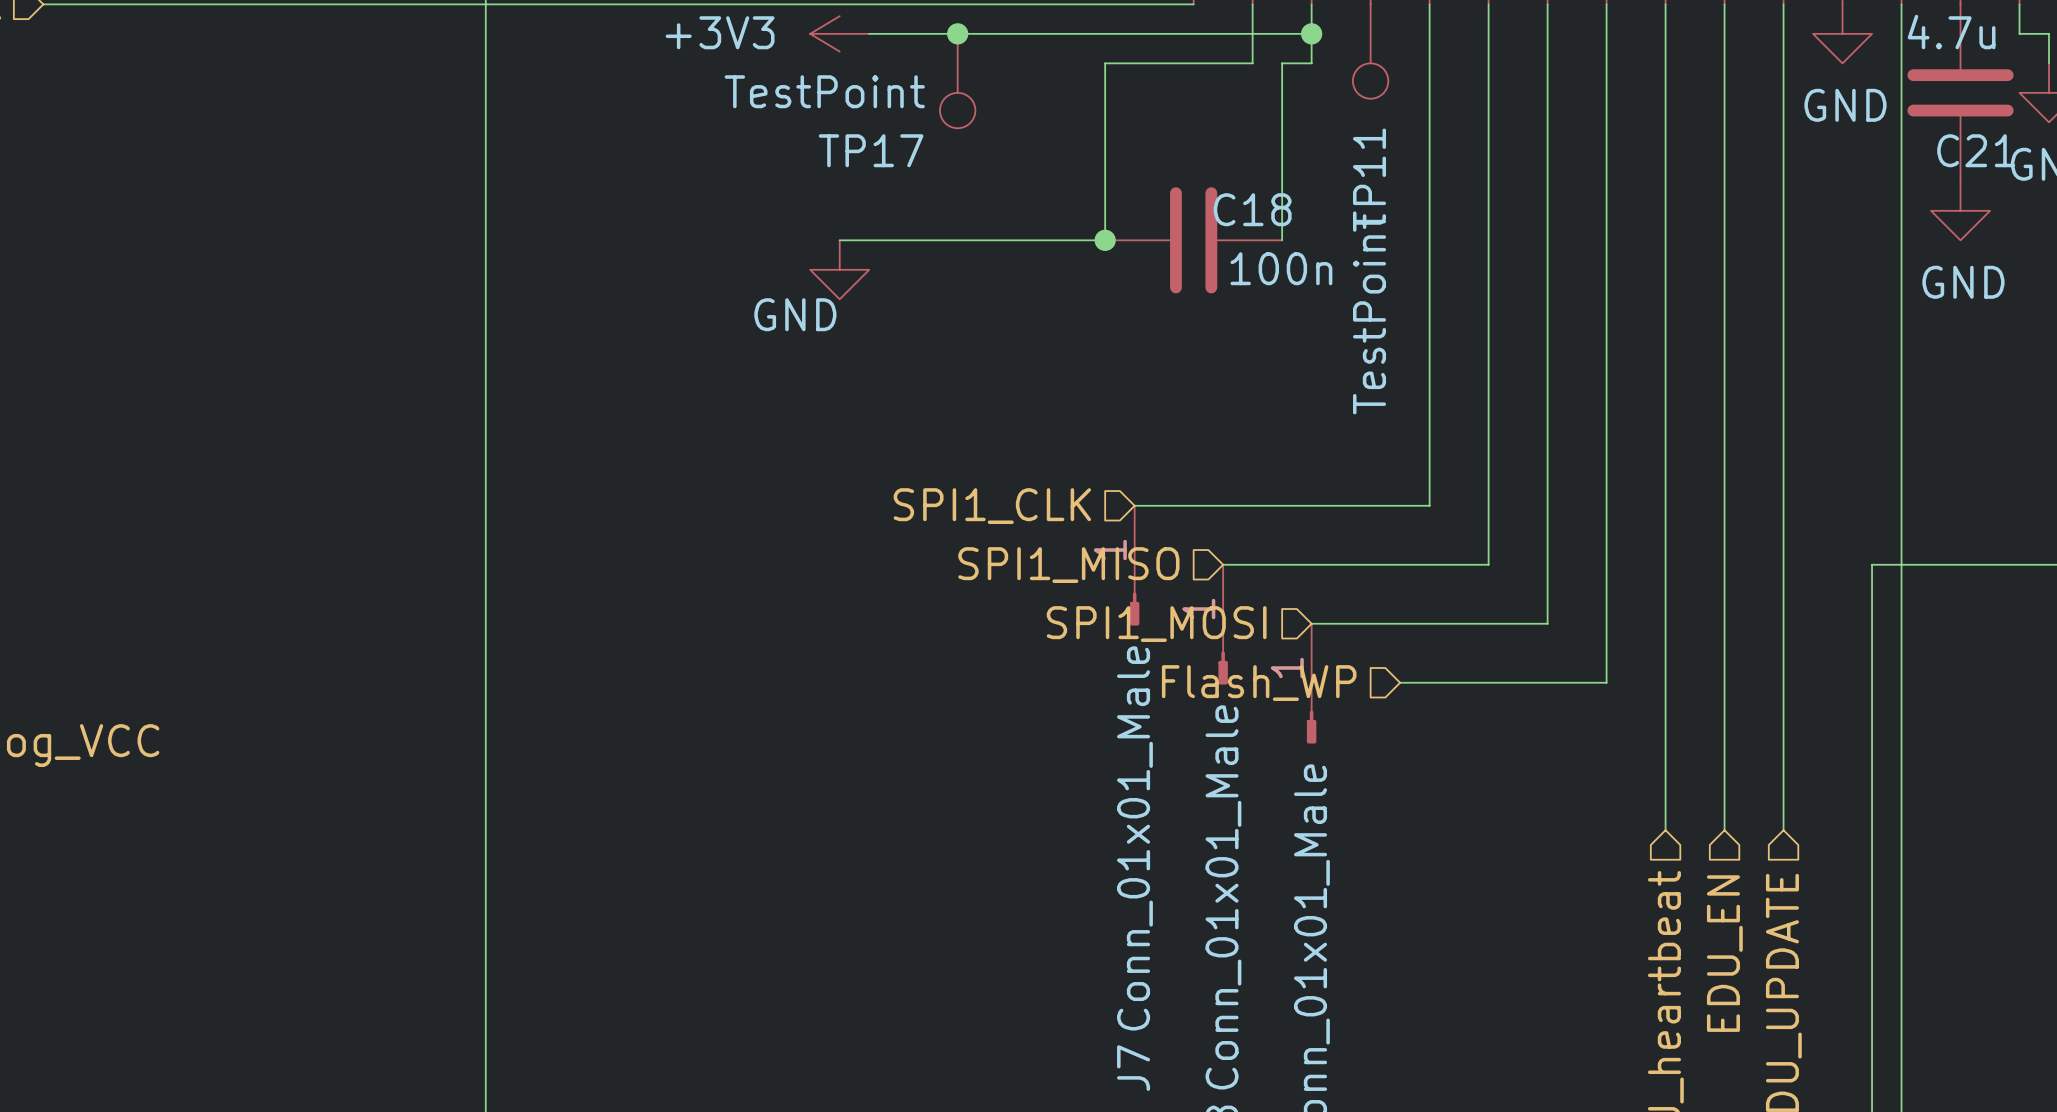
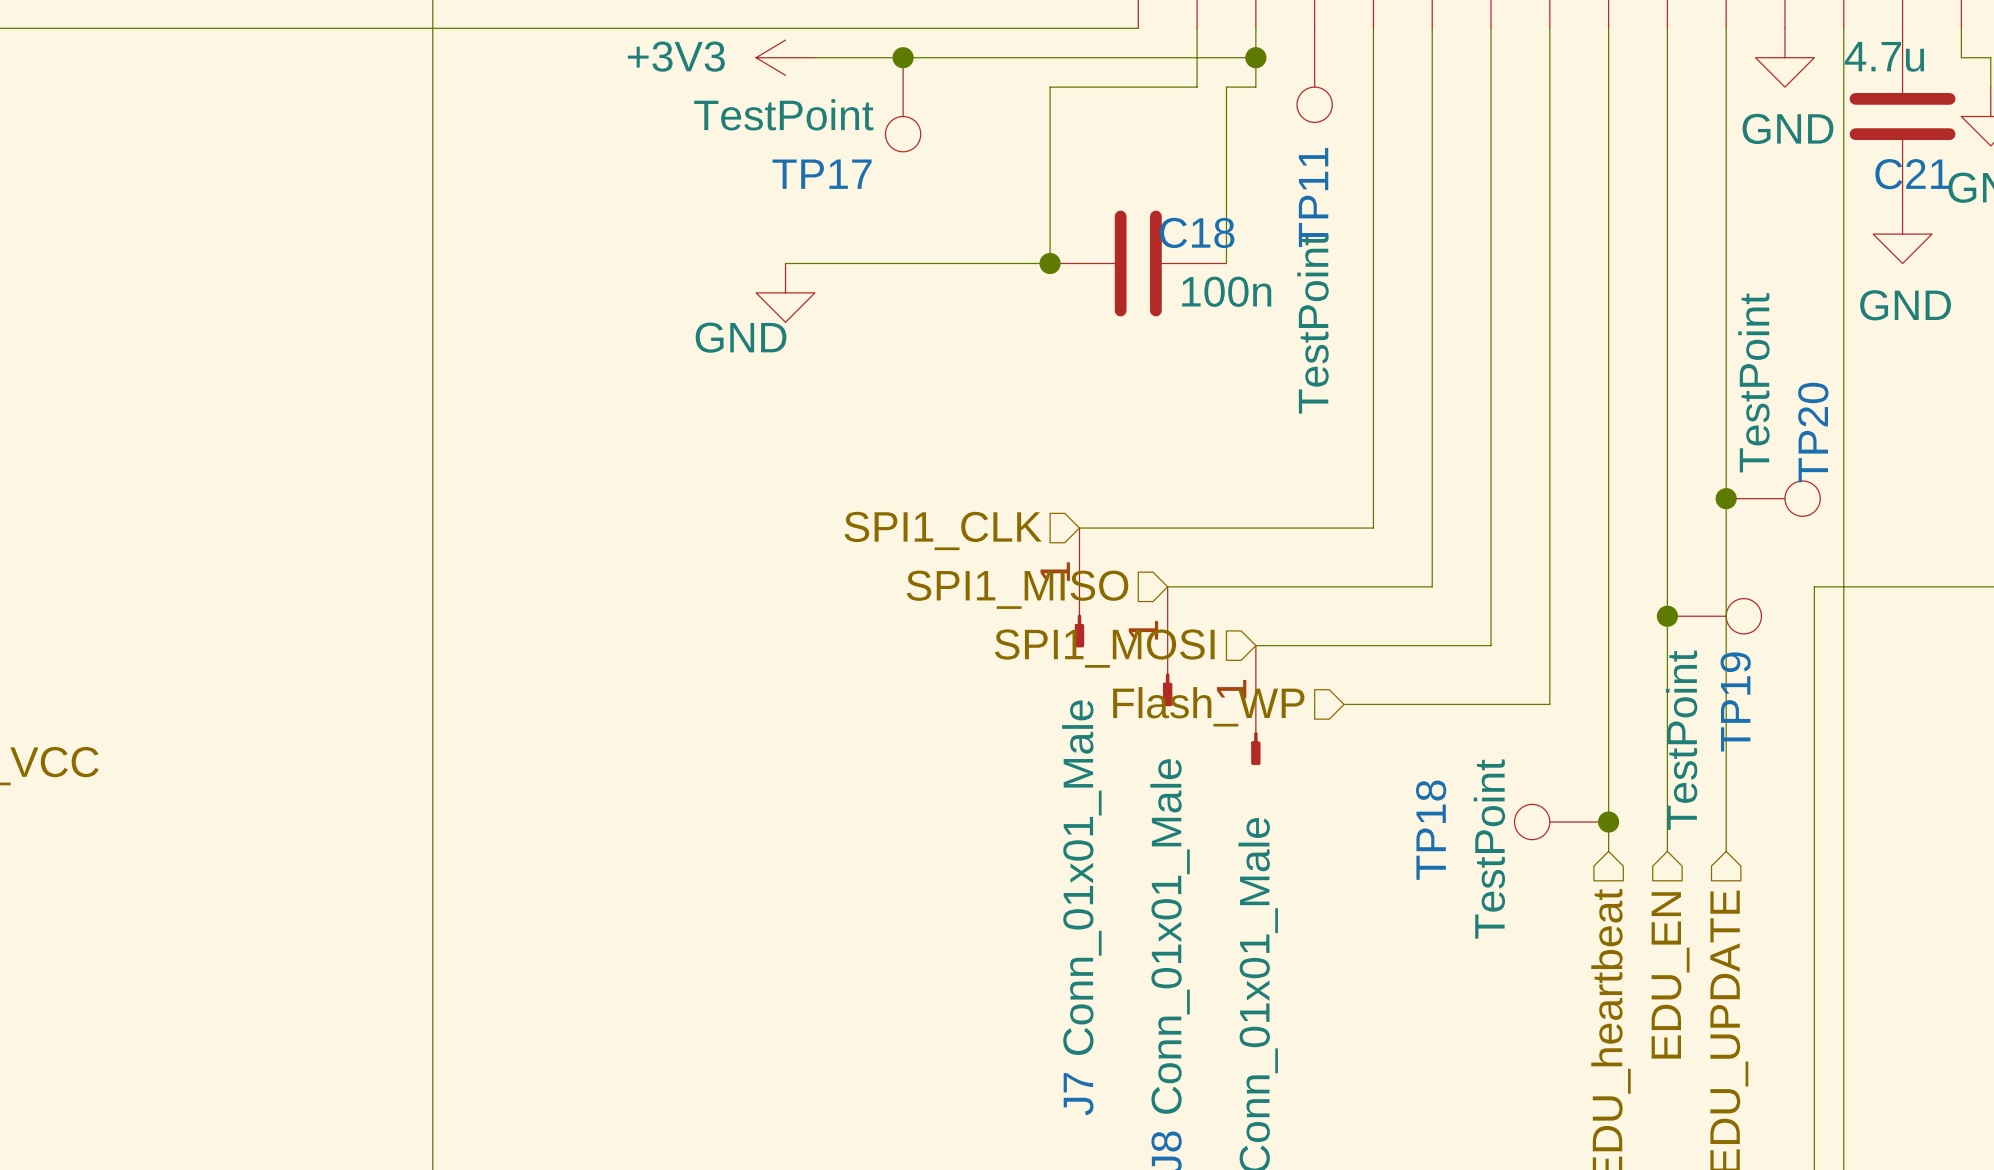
junction: none -> (1726, 498)
TP20: none -> TestPoint (1773, 498)
junction: none -> (1667, 616)
TP19: none -> TestPoint (1714, 616)
TP18: none -> TestPoint (1561, 822)
junction: none -> (1608, 822)

